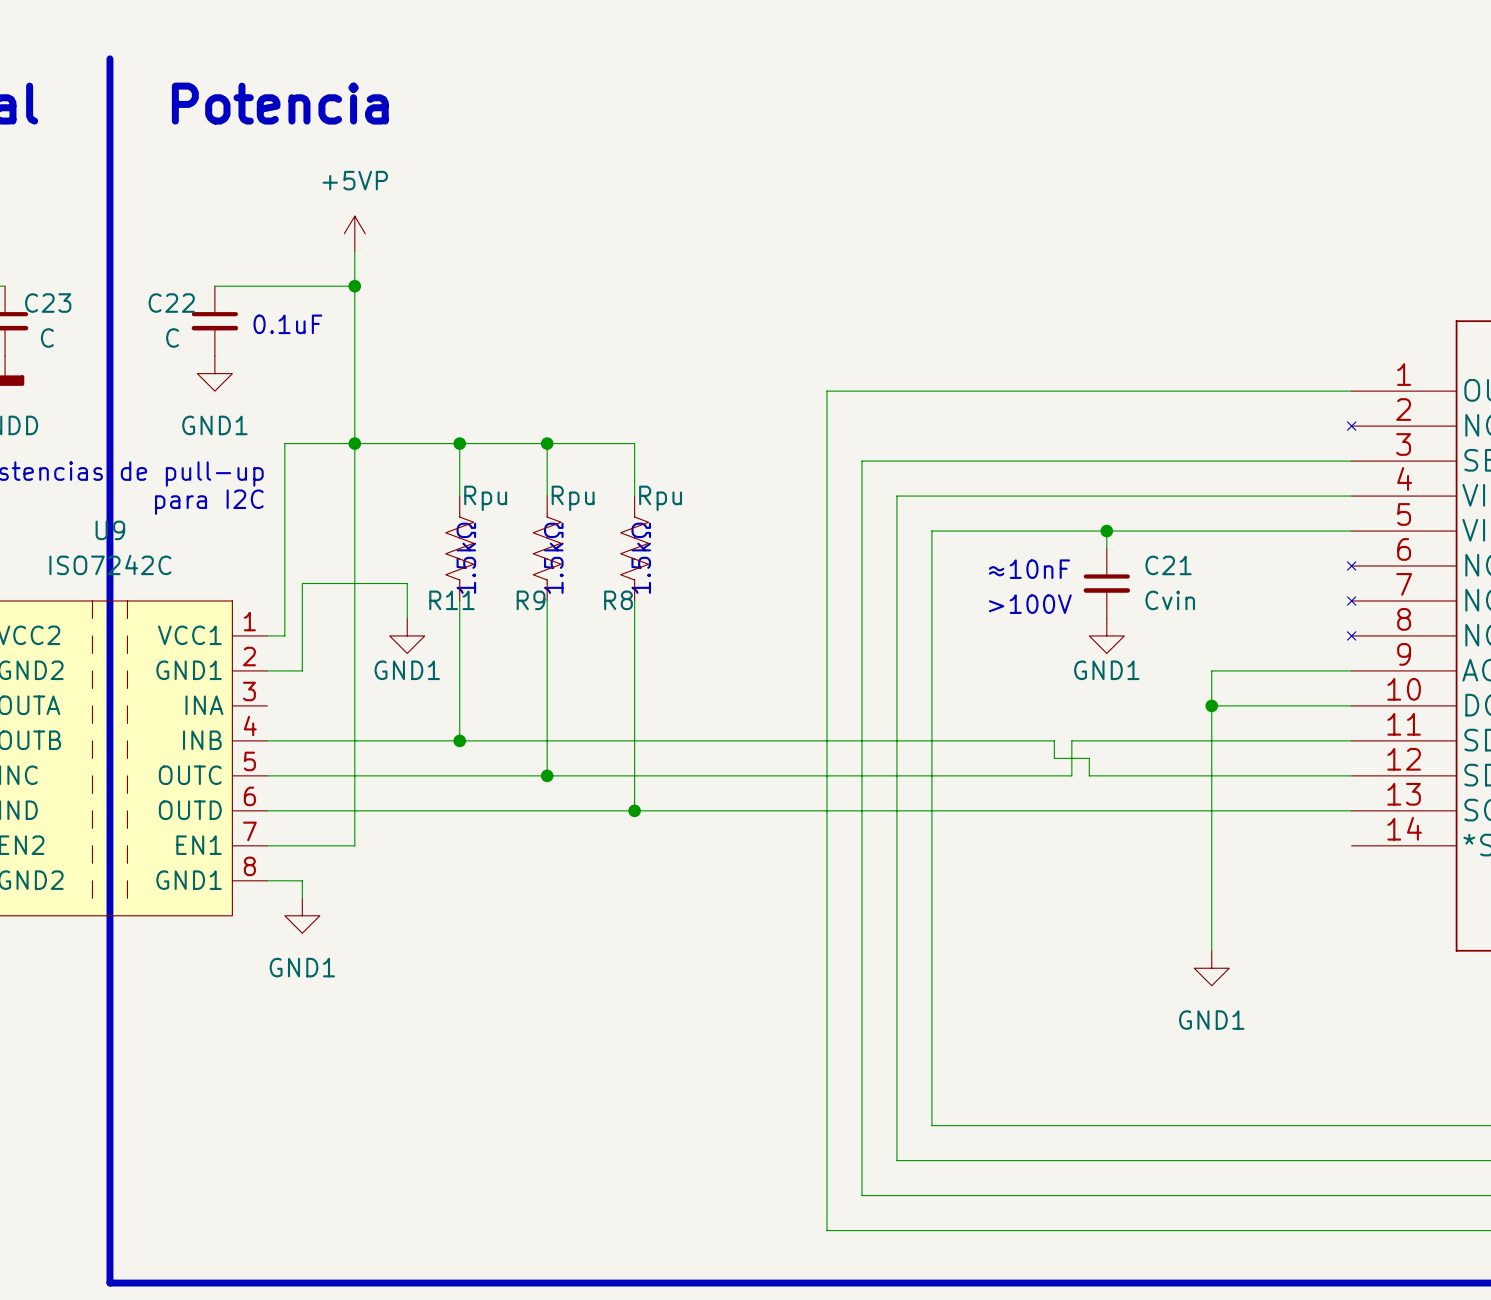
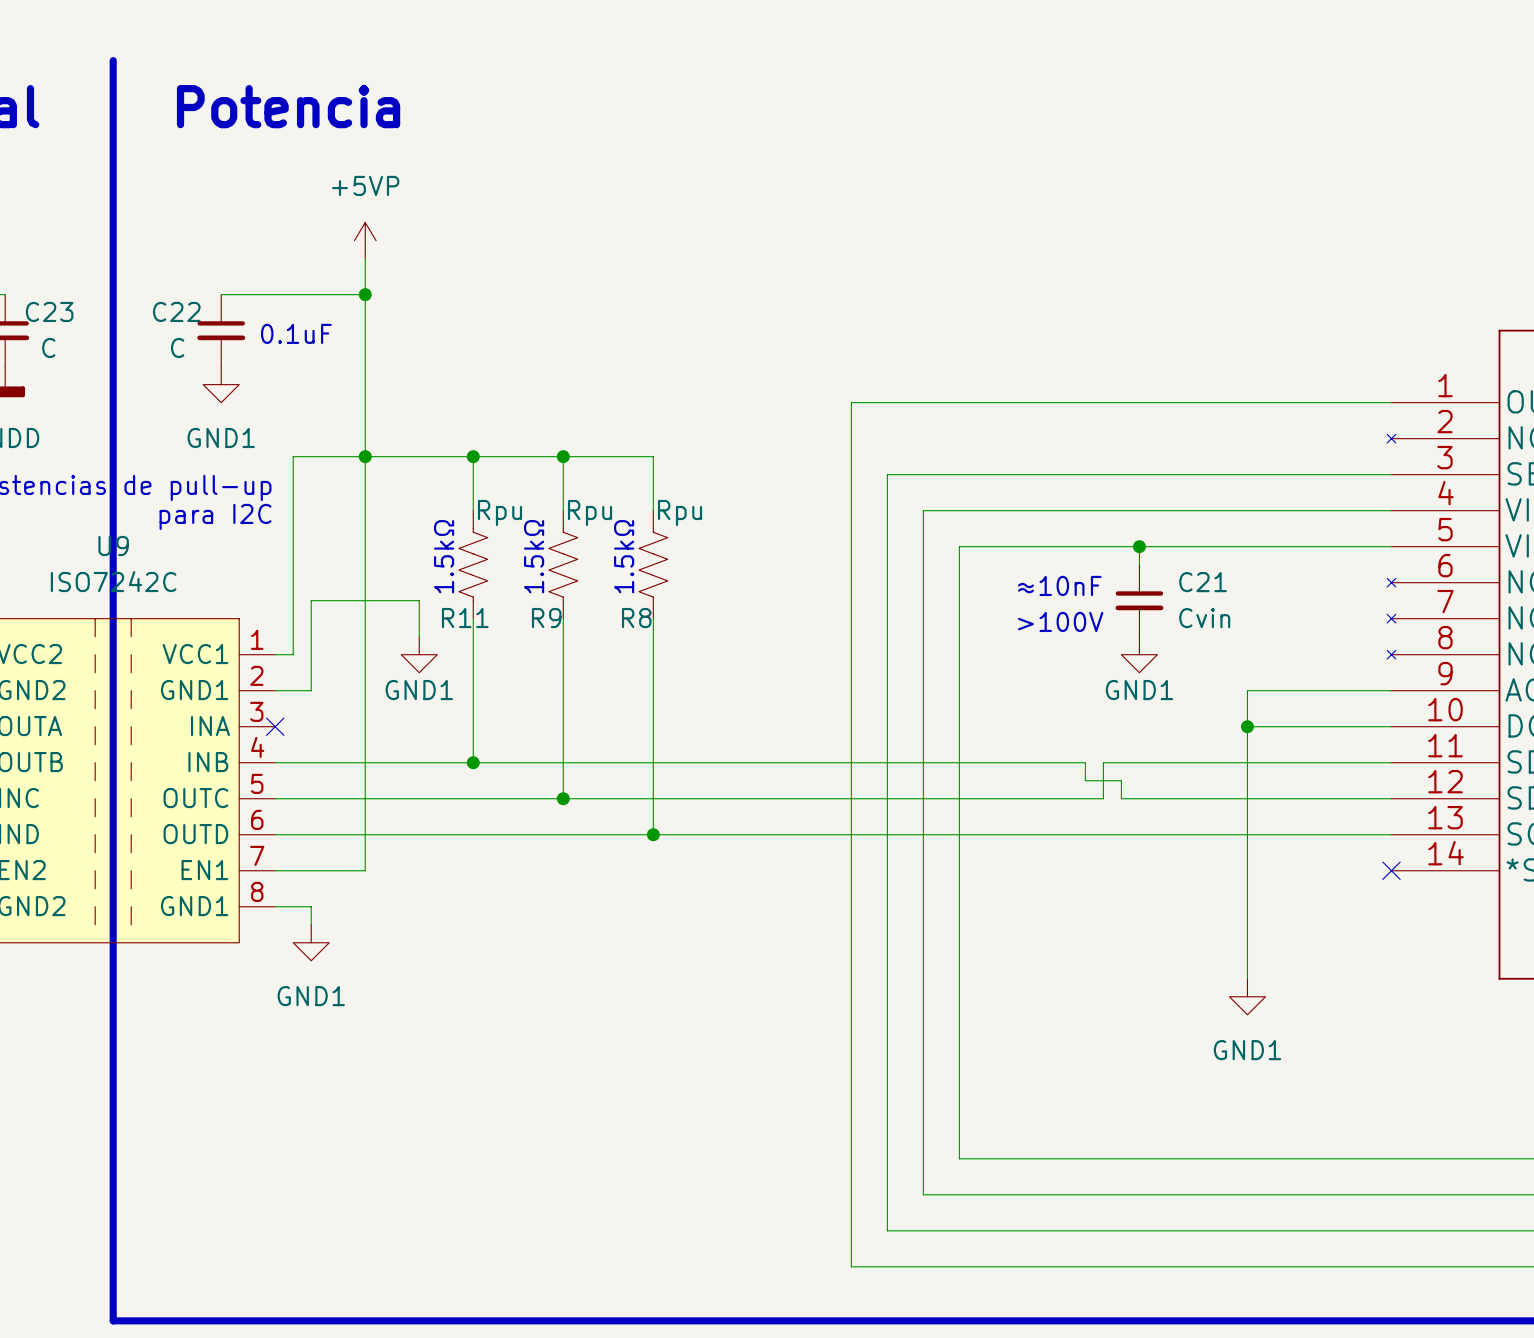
text position: 1.5kΩ (466, 558) -> 1.5kΩ (444, 556)
text position: 1.5kΩ (553, 558) -> 1.5kΩ (534, 556)
text position: 1.5kΩ (641, 558) -> 1.5kΩ (624, 556)
no-connect mark: none -> (275, 726)
no-connect mark: none -> (1391, 870)

